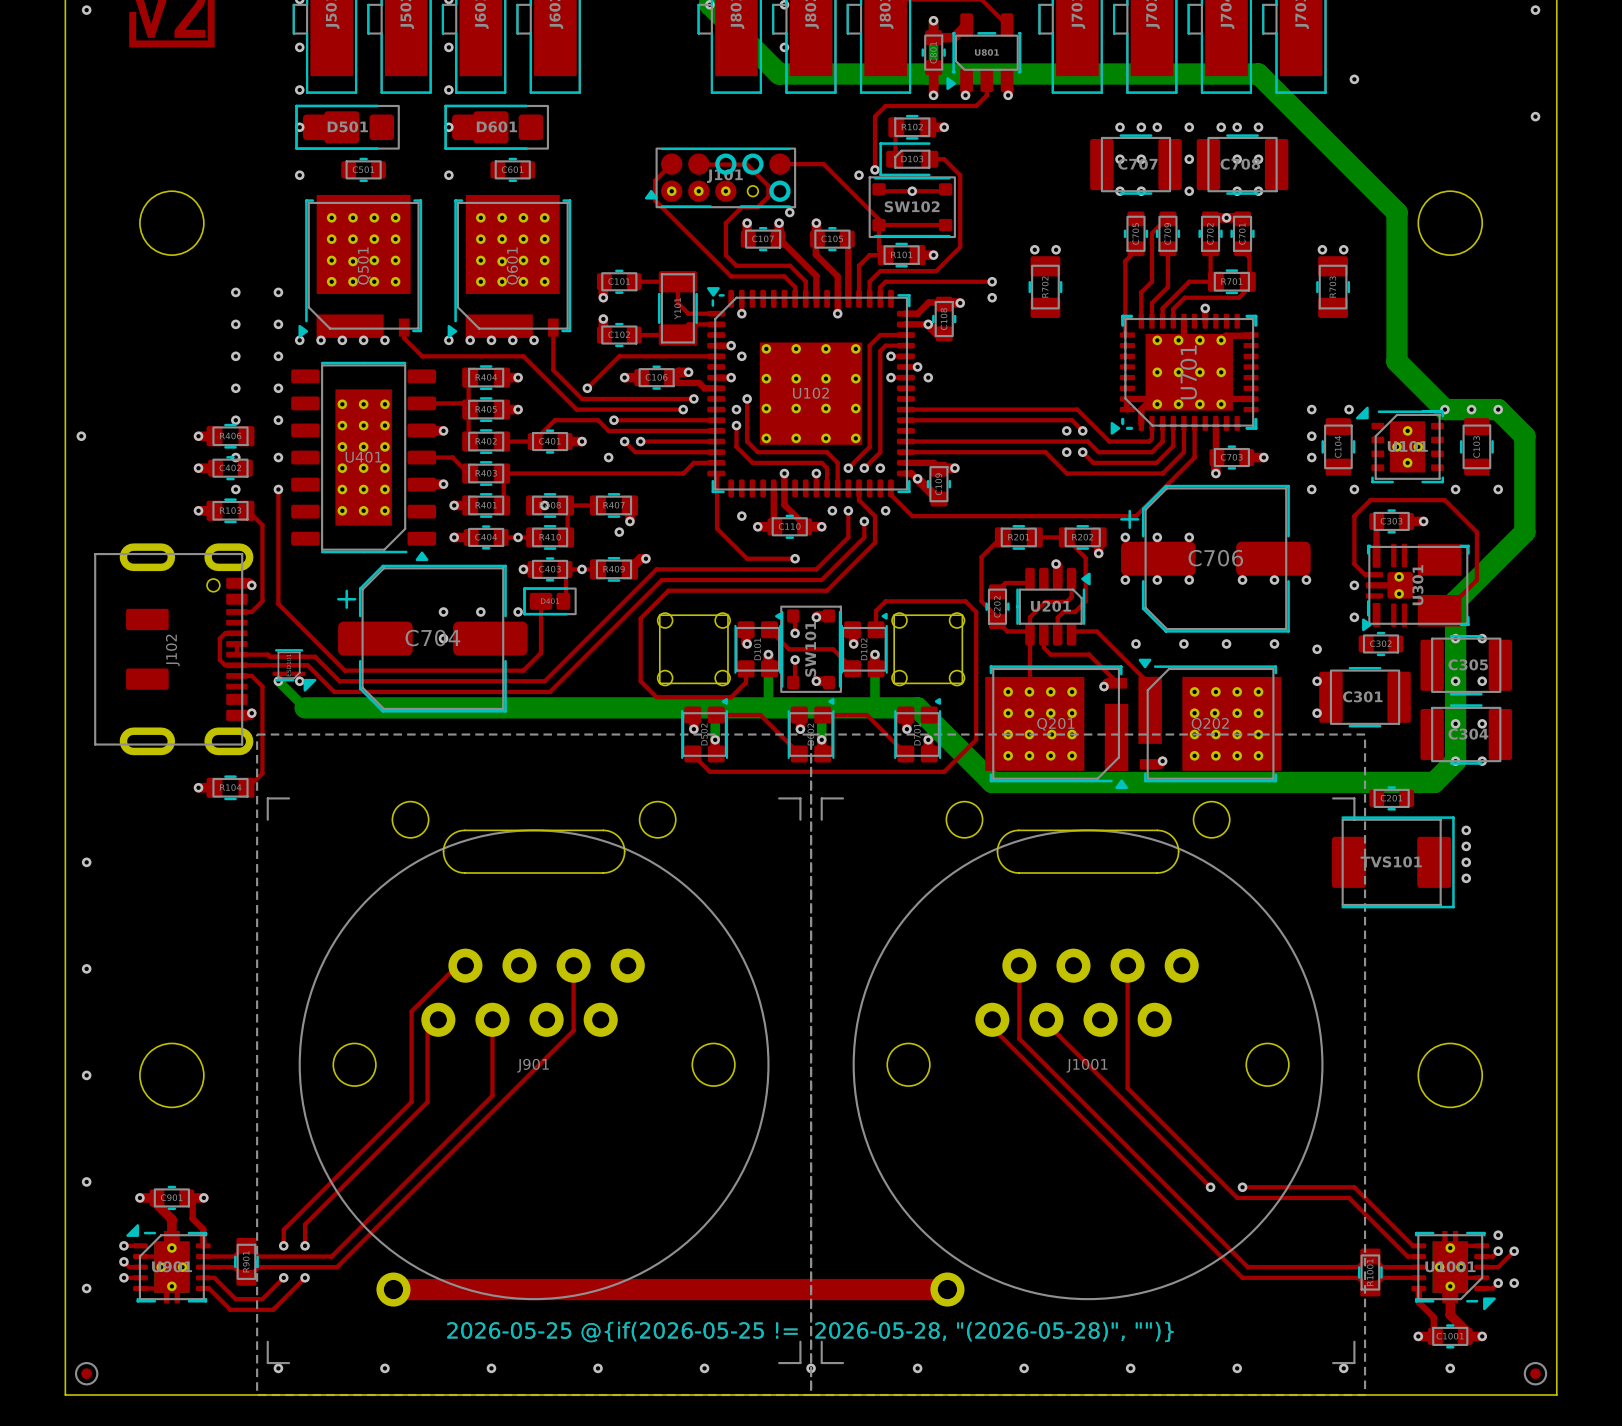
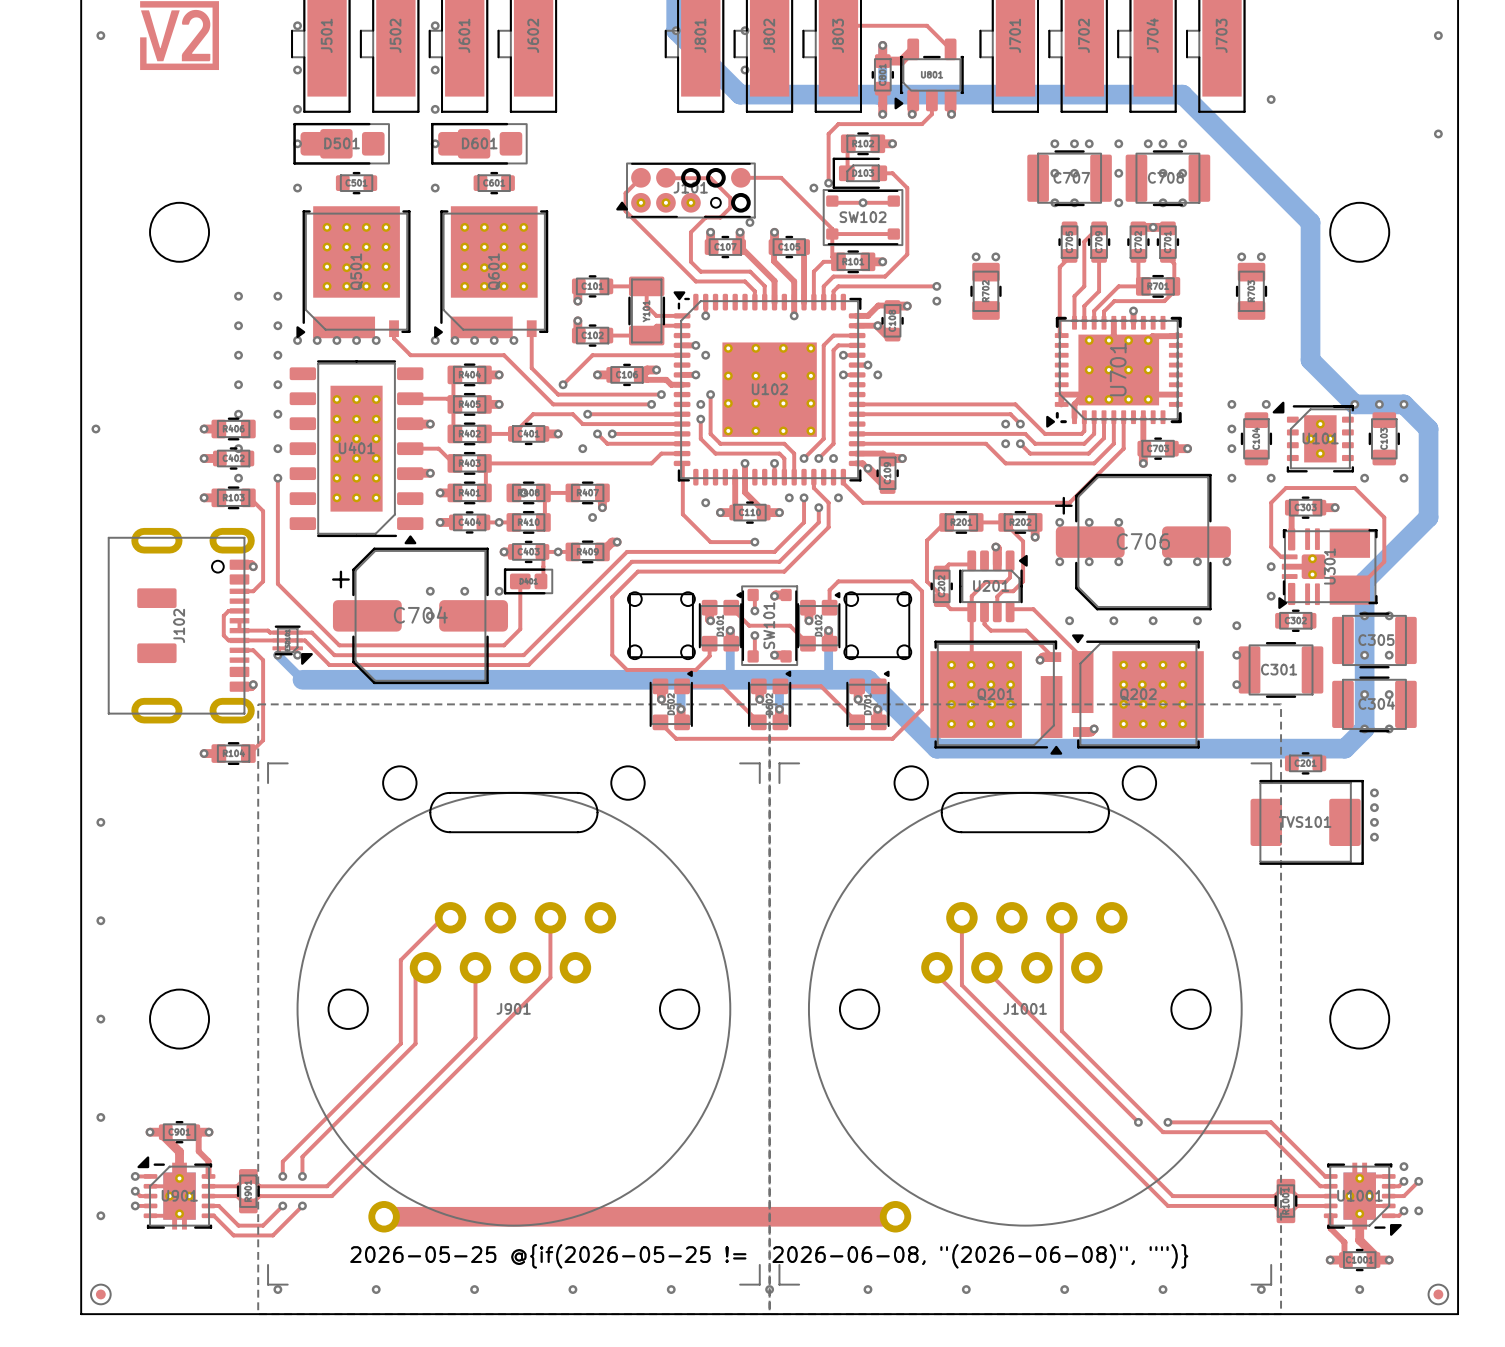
drawing shape: [447, 1321, 1174, 1343] -> [350, 1244, 1189, 1269]

